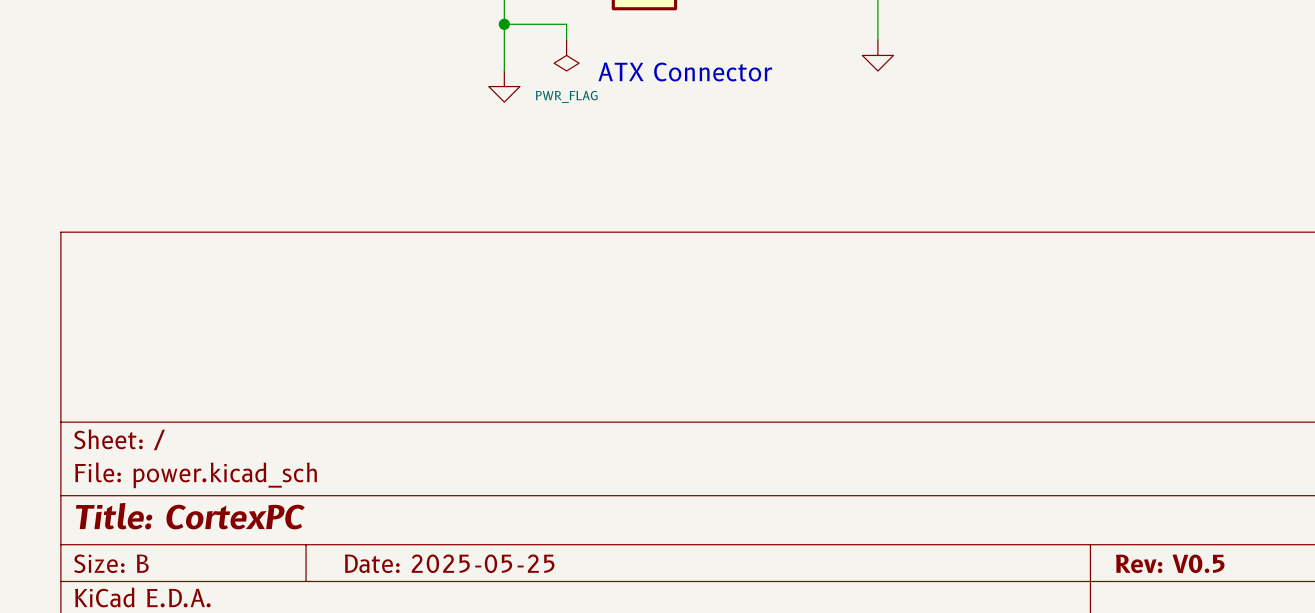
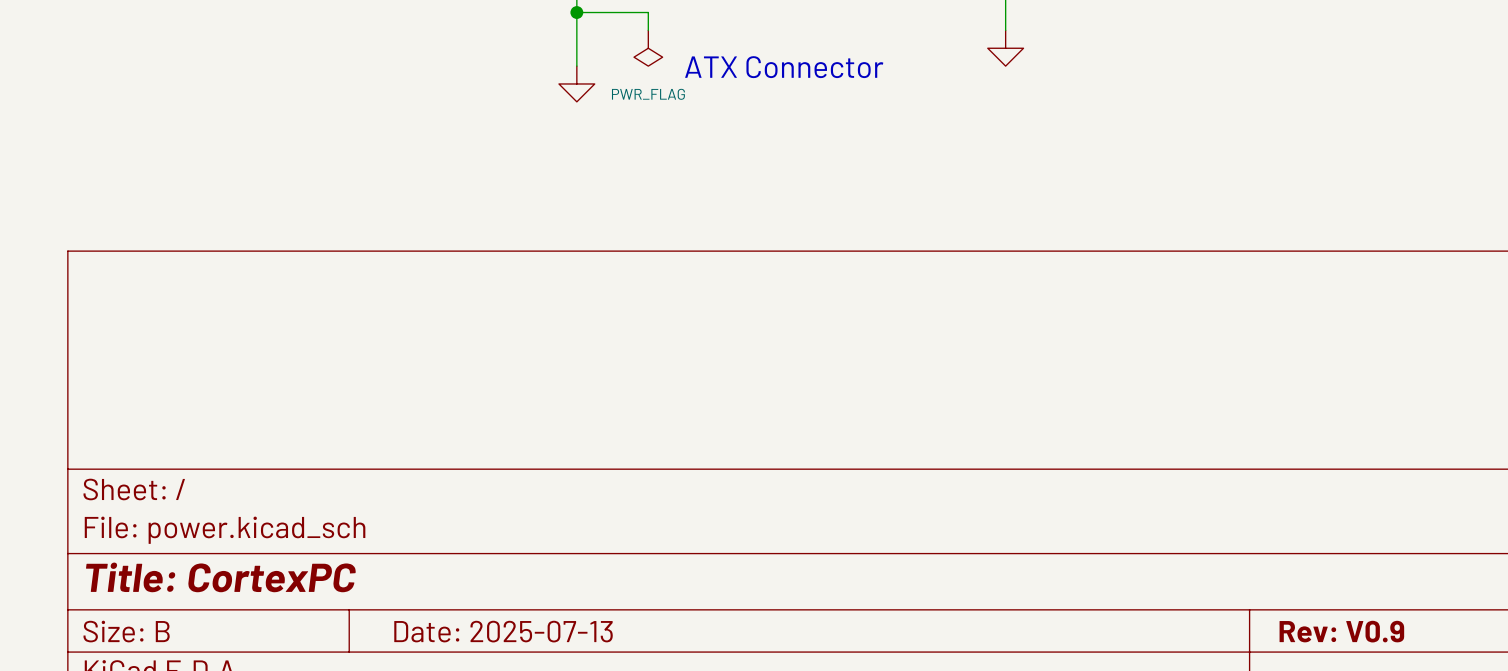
title block: Date: 2025-05-25 (449, 563) -> Date: 2025-07-13 (503, 631)
title block: Rev: V0.5 (1170, 563) -> Rev: V0.9 (1341, 631)

